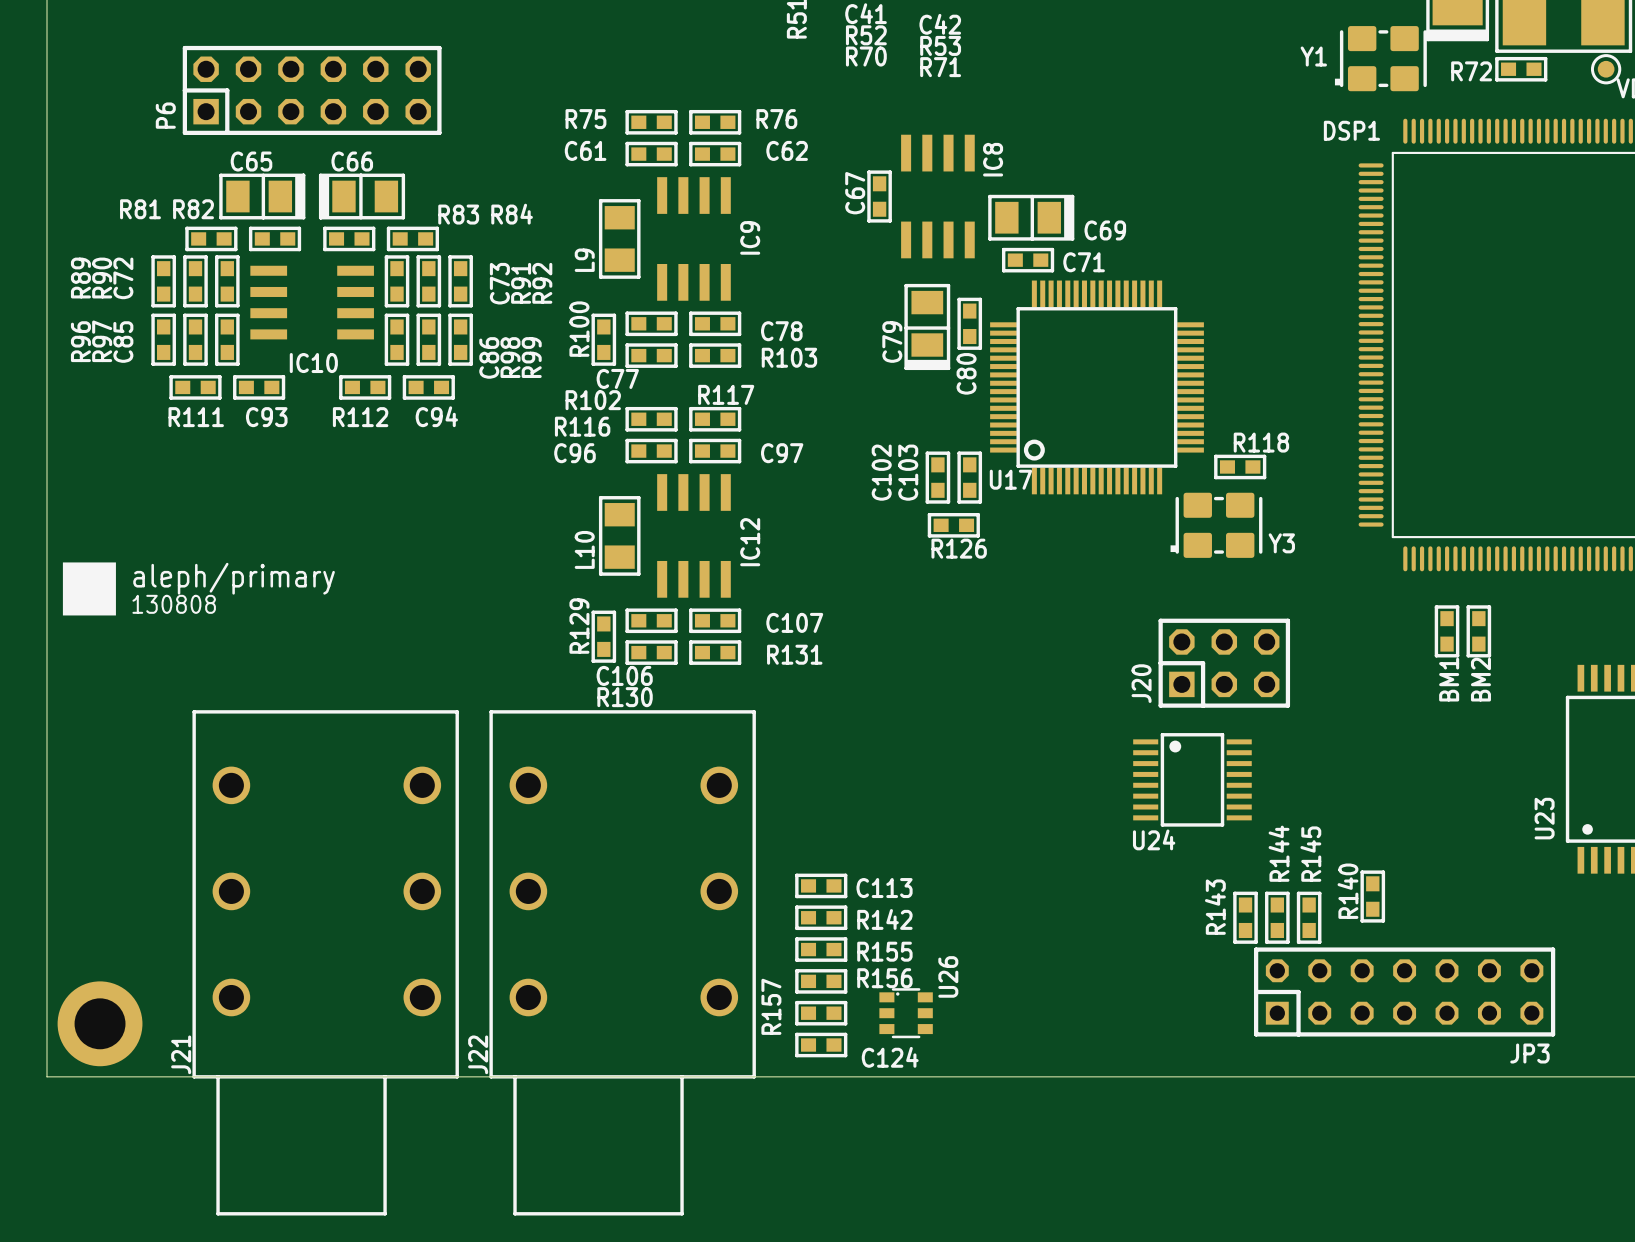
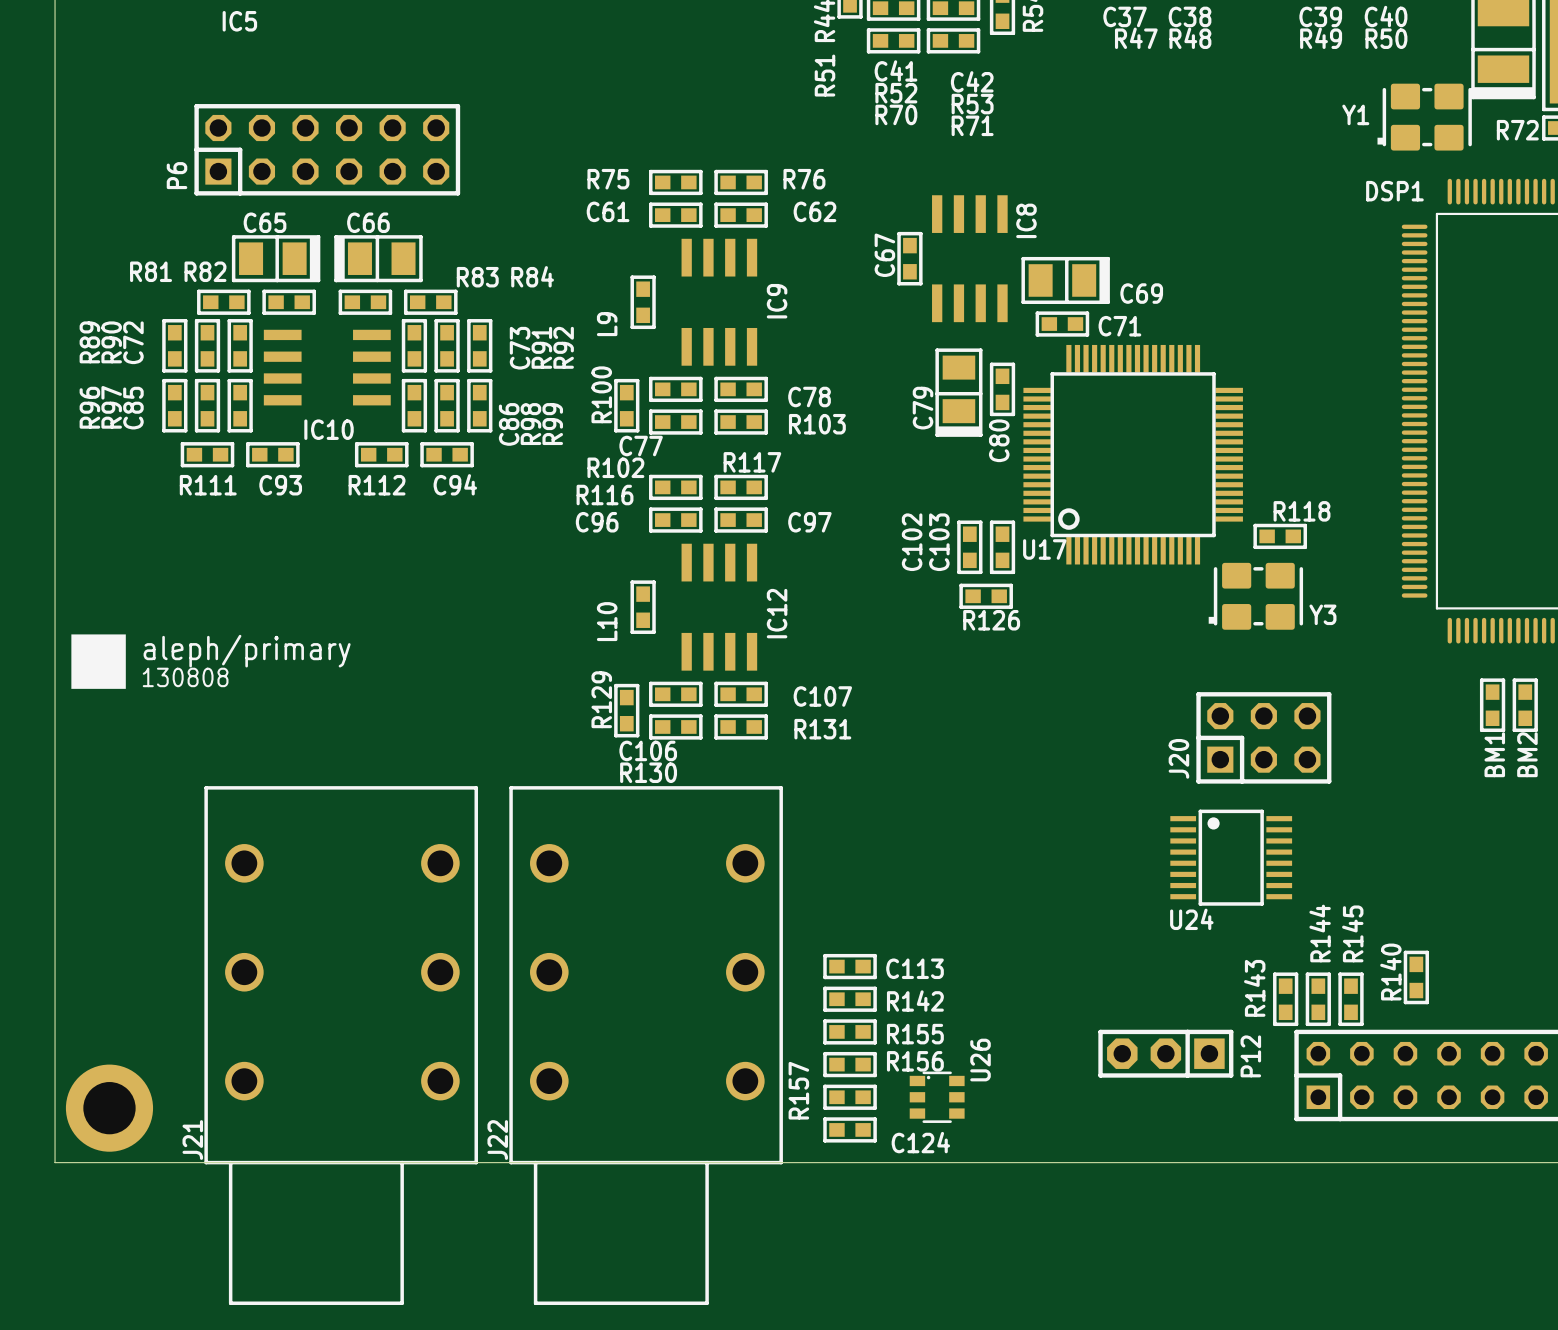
L9 footprint: [598, 199, 641, 279] -> [630, 275, 656, 330]
L10 footprint: [598, 496, 641, 576] -> [630, 580, 656, 634]
P12: none -> (1165, 1053)

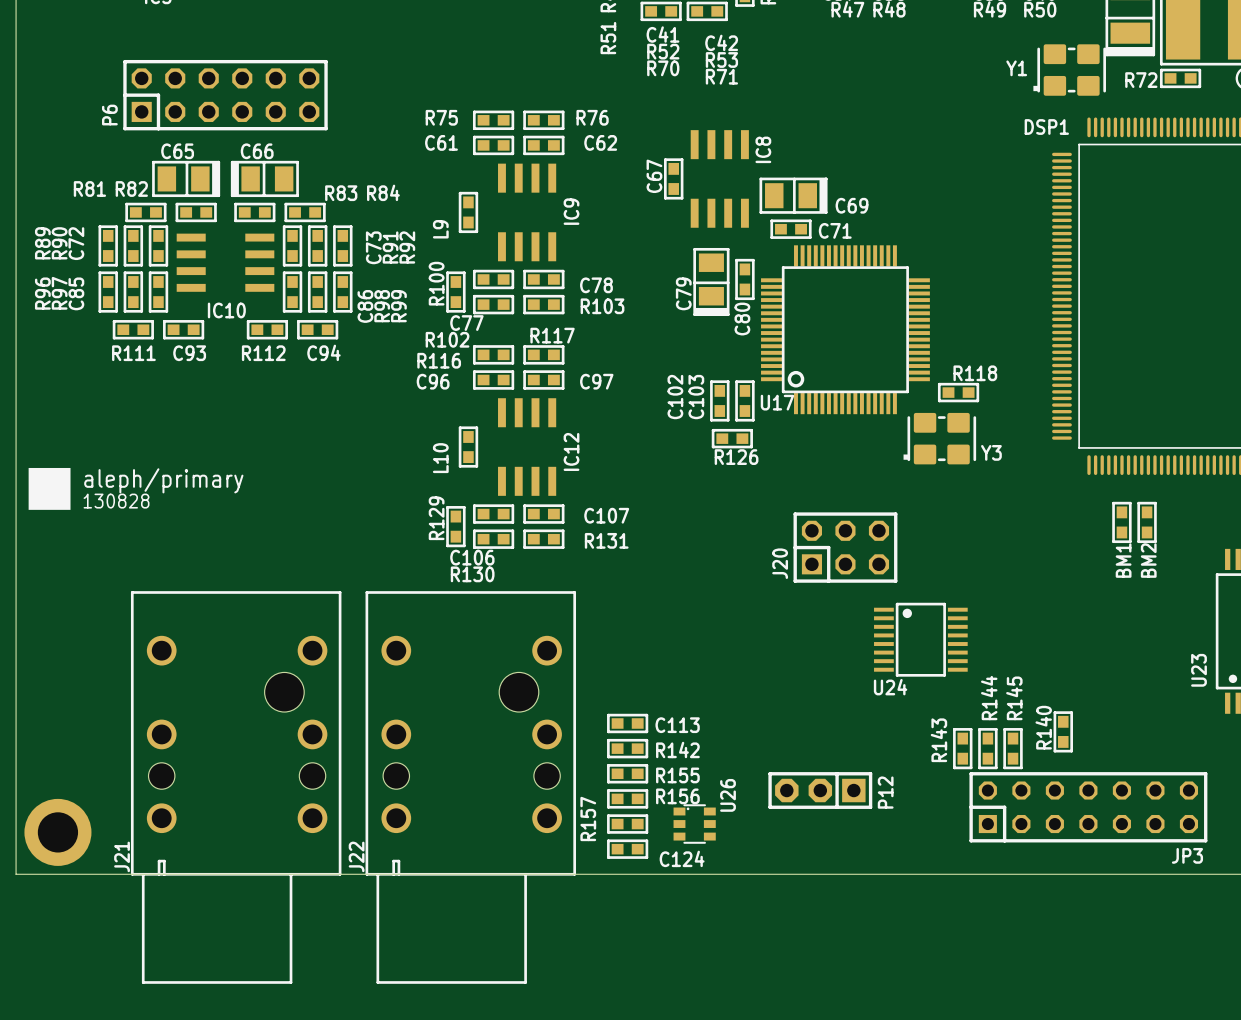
text: 130808 (185, 677) -> 130828 (116, 501)
J20 position: (1263, 737) -> (845, 547)
J21 footprint: [204, 786, 478, 1305] -> [130, 591, 342, 984]
J22 footprint: [509, 786, 783, 1305] -> [365, 591, 577, 984]
P12 position: (1165, 1053) -> (820, 790)

